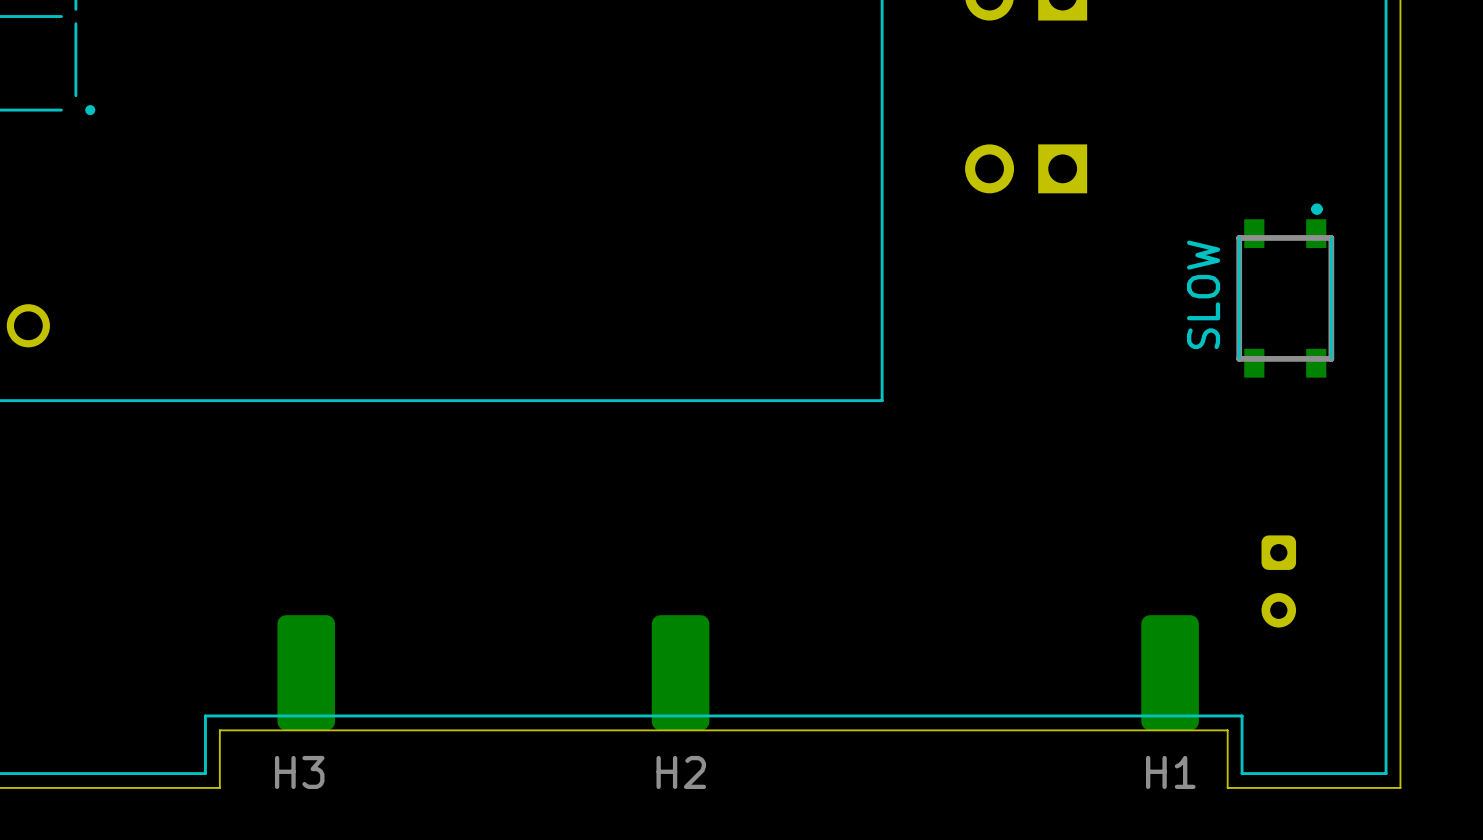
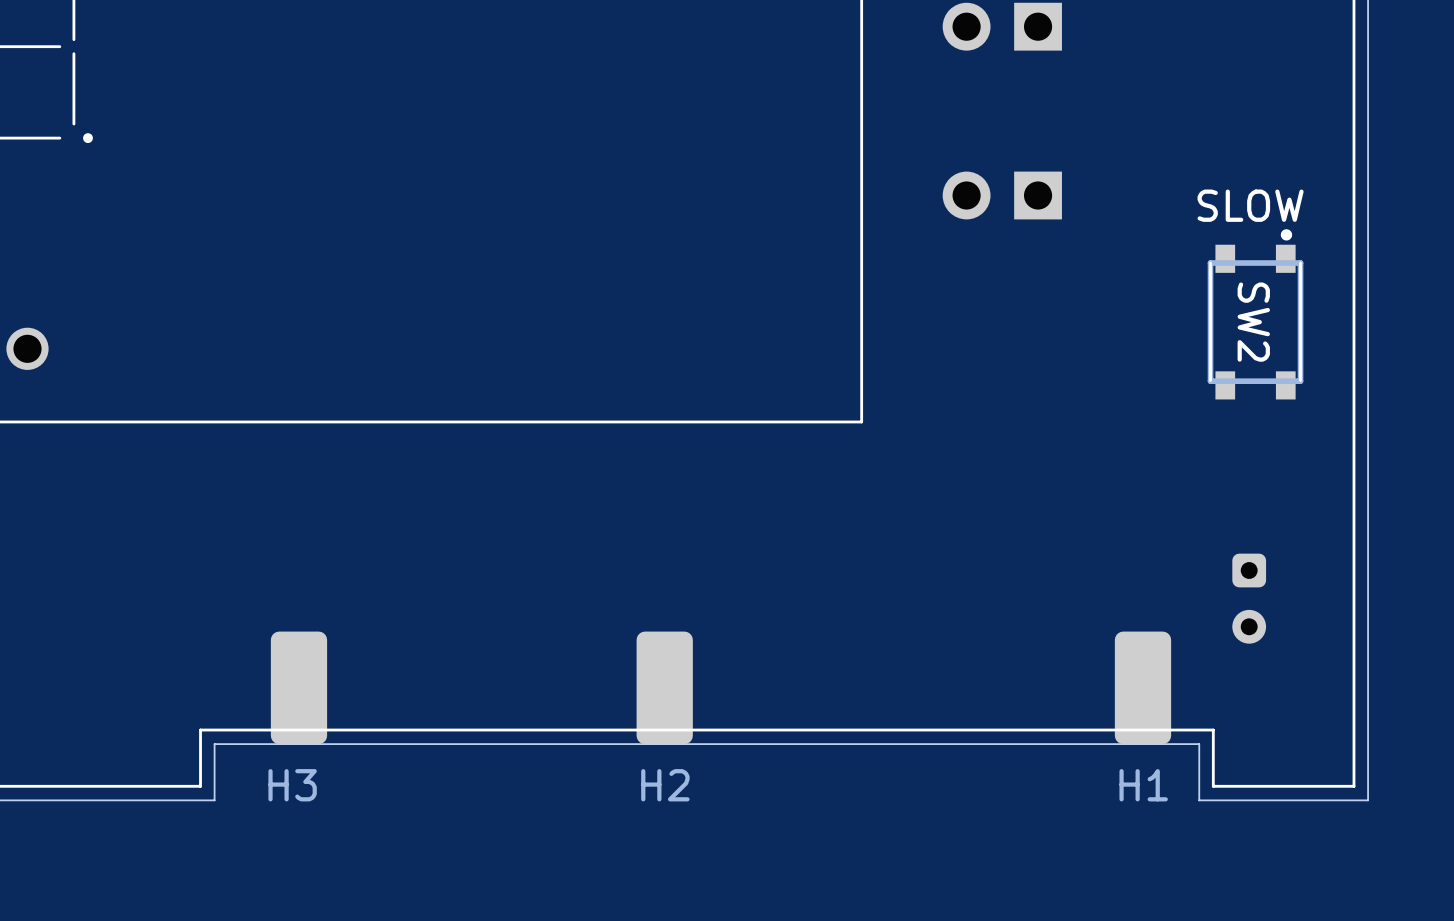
SW2 text rotation: 0° (1203, 294) -> 90° clockwise (1250, 205)
SW2 name: none -> SW2 (1253, 322)

